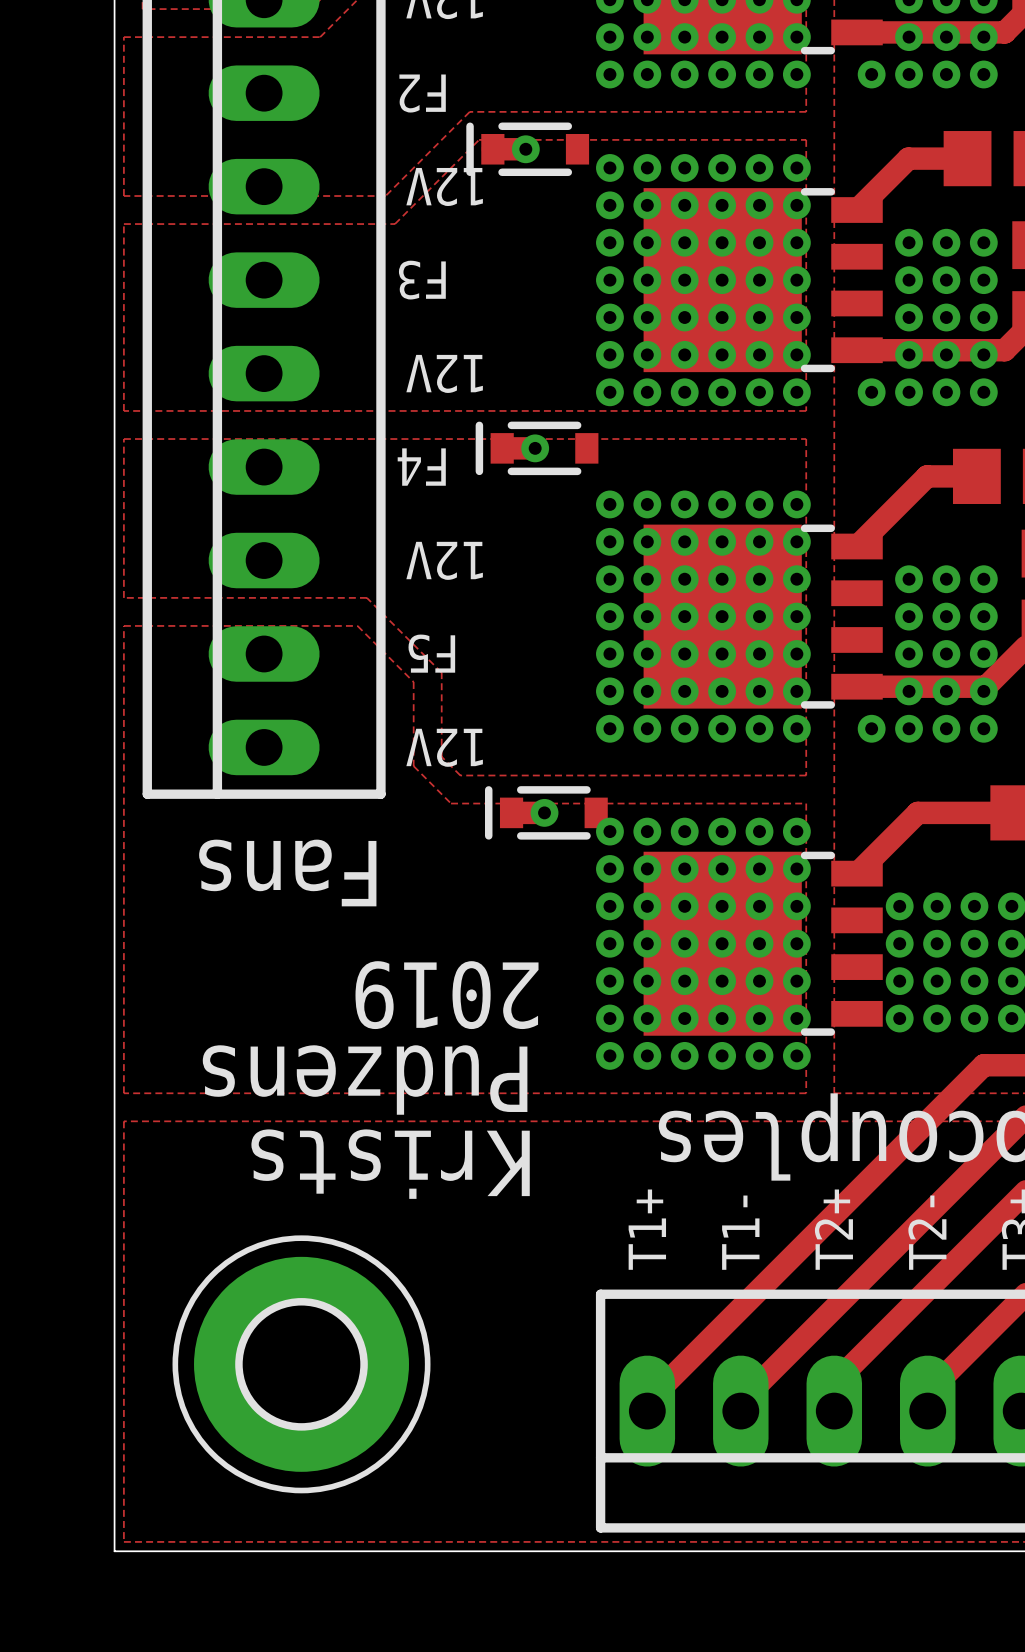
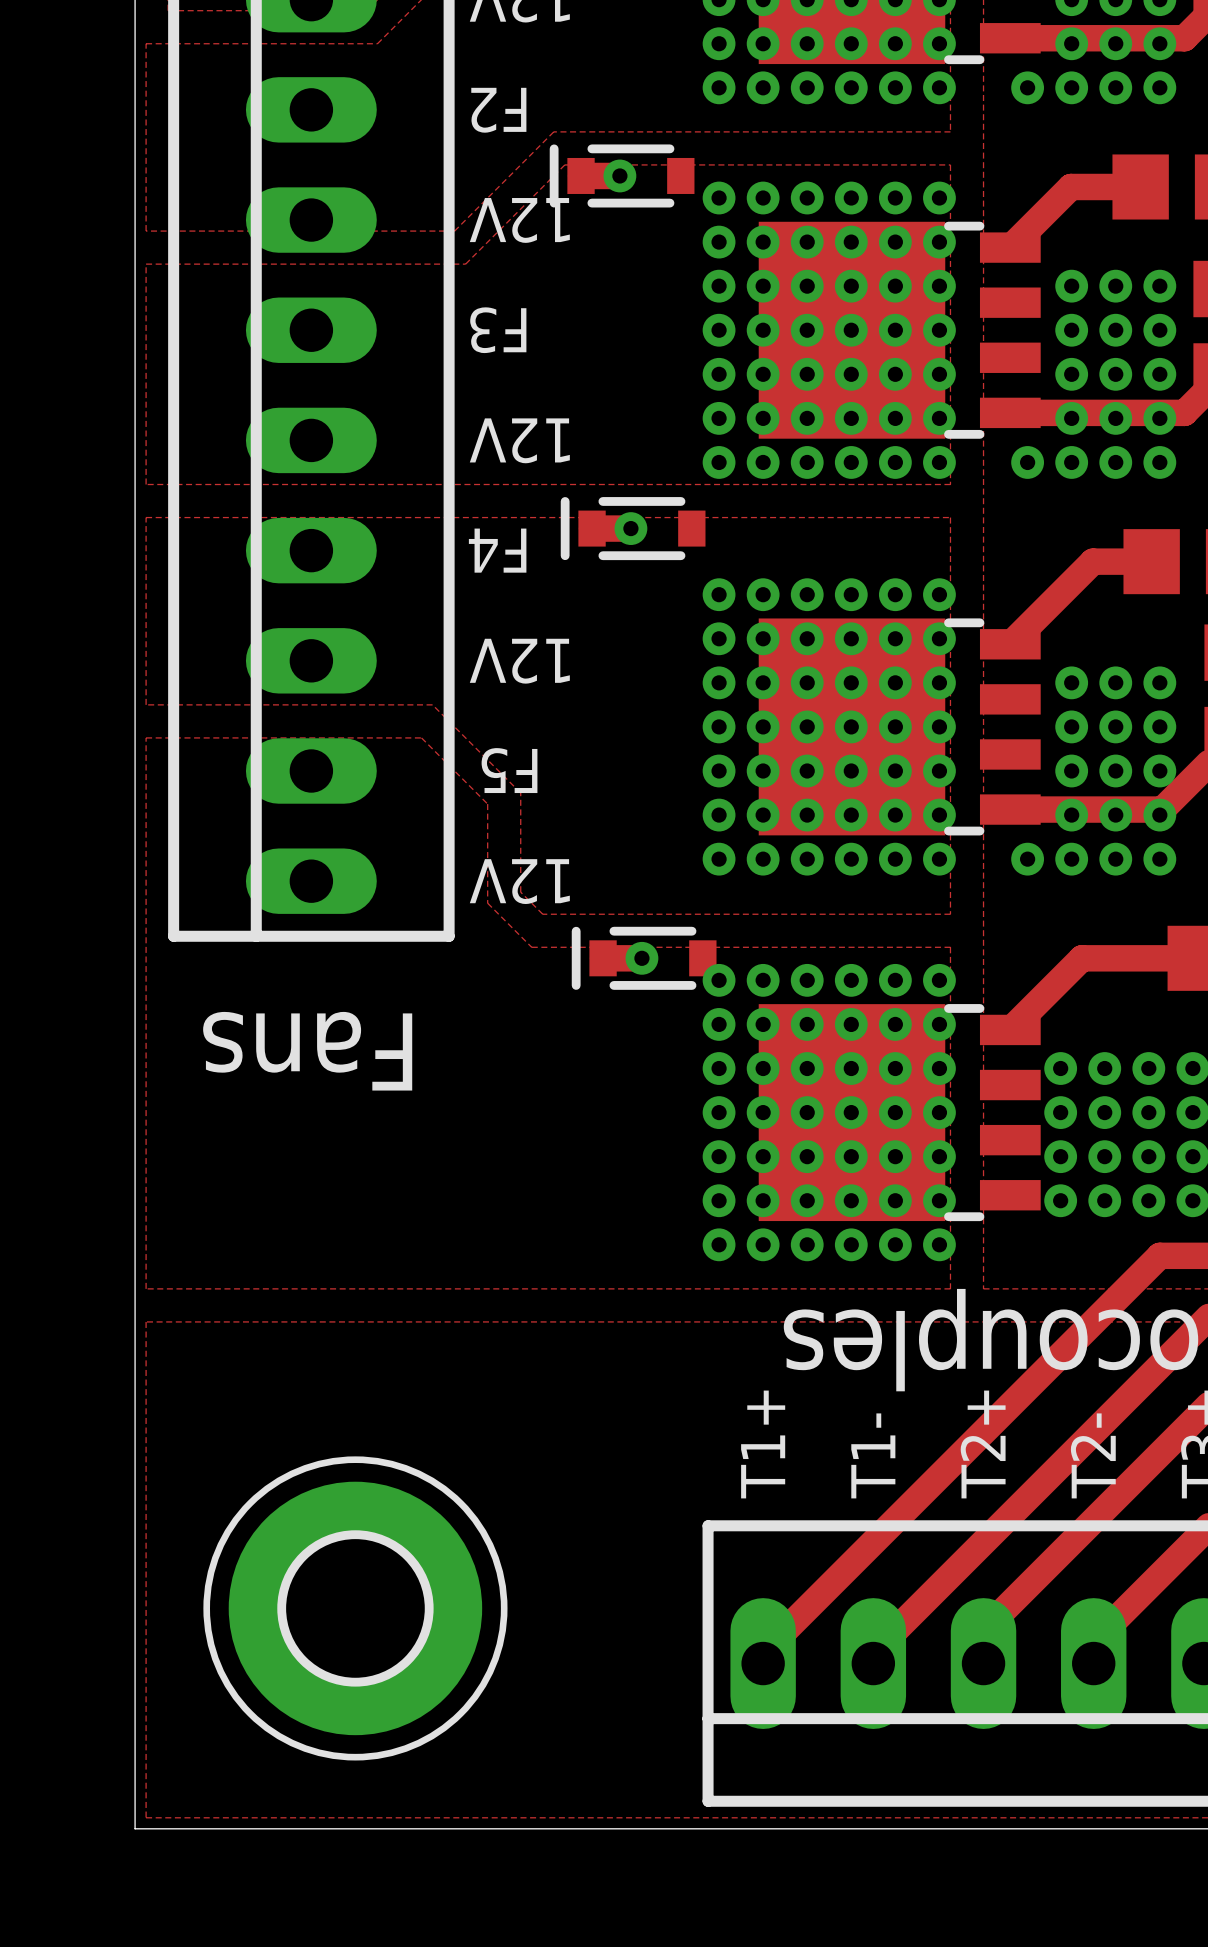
text position: Fans (287, 873) -> Fans (307, 1051)
text: 2019 (447, 995) -> none
text: Pudzens (365, 1080) -> none
text: Krists (390, 1164) -> none

